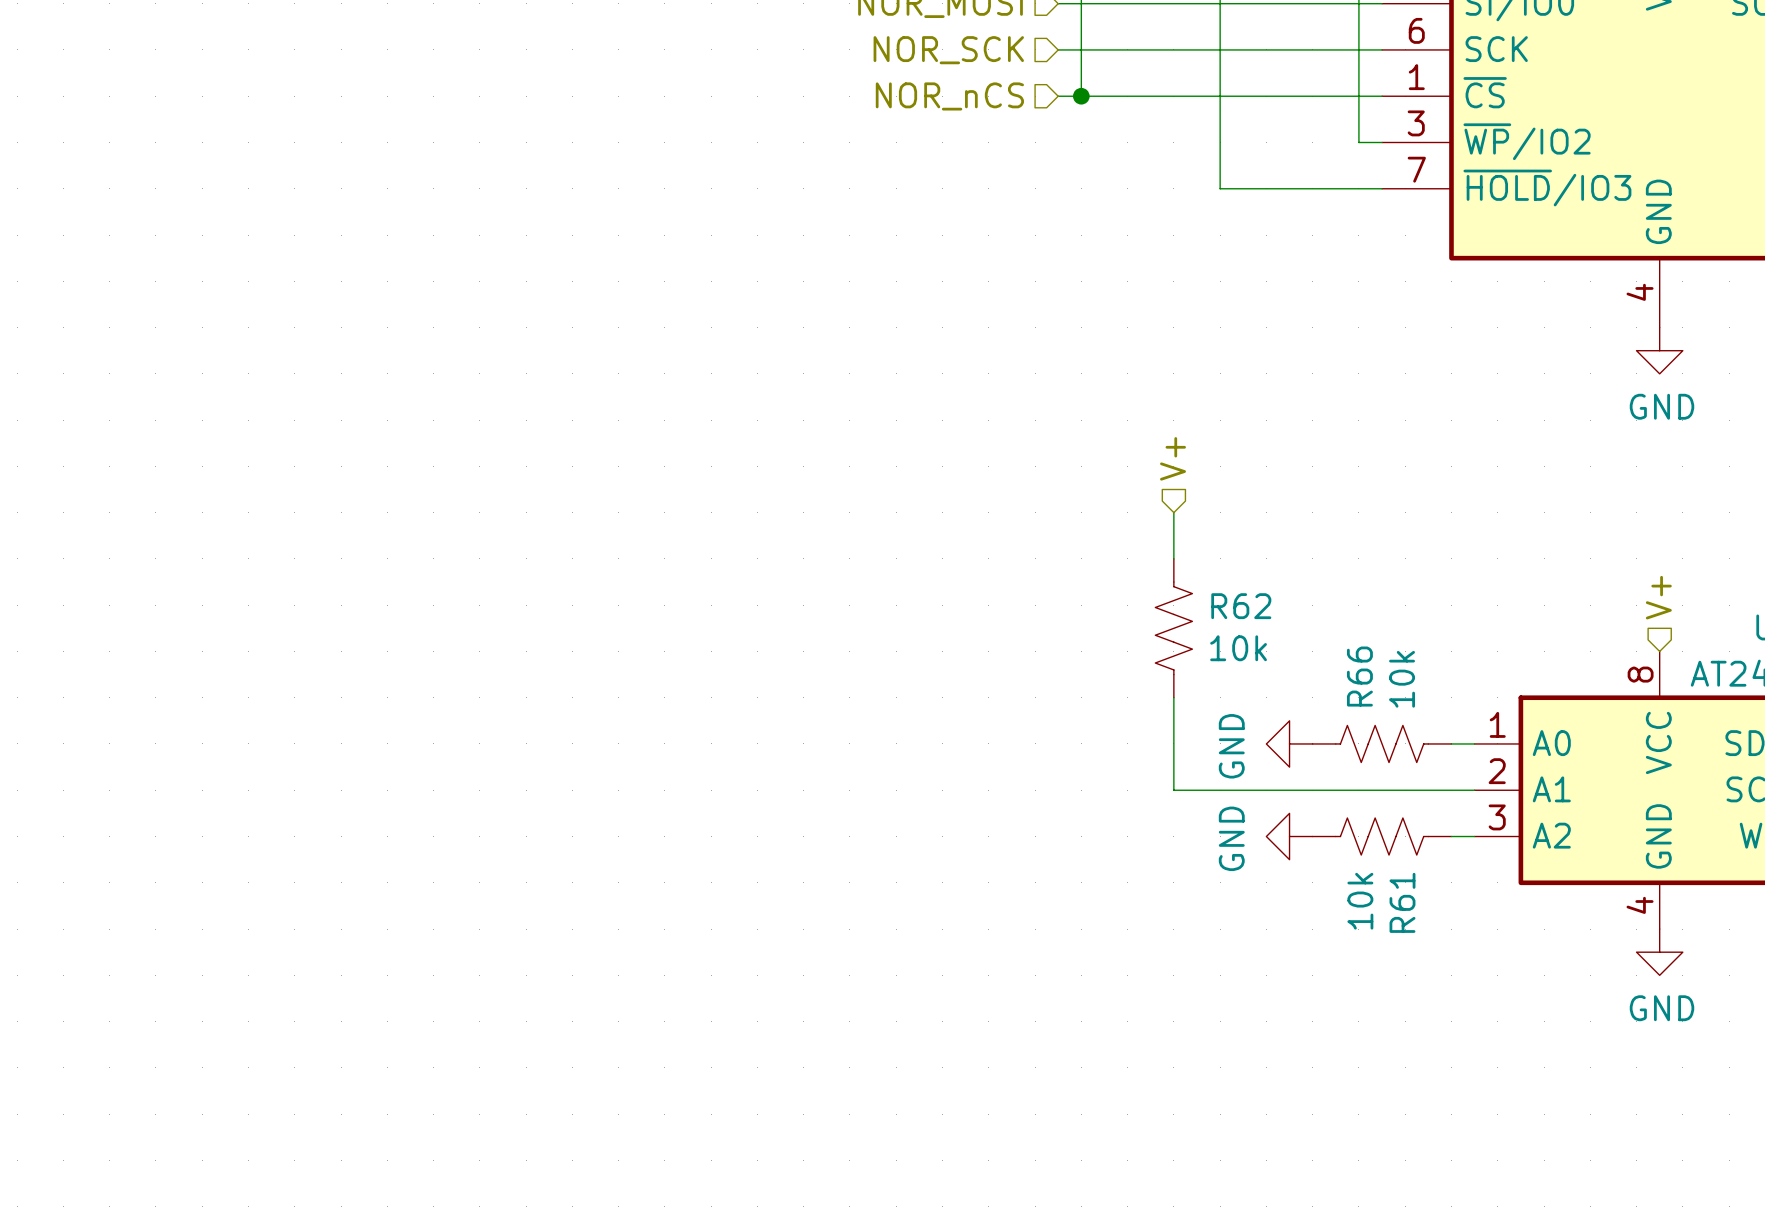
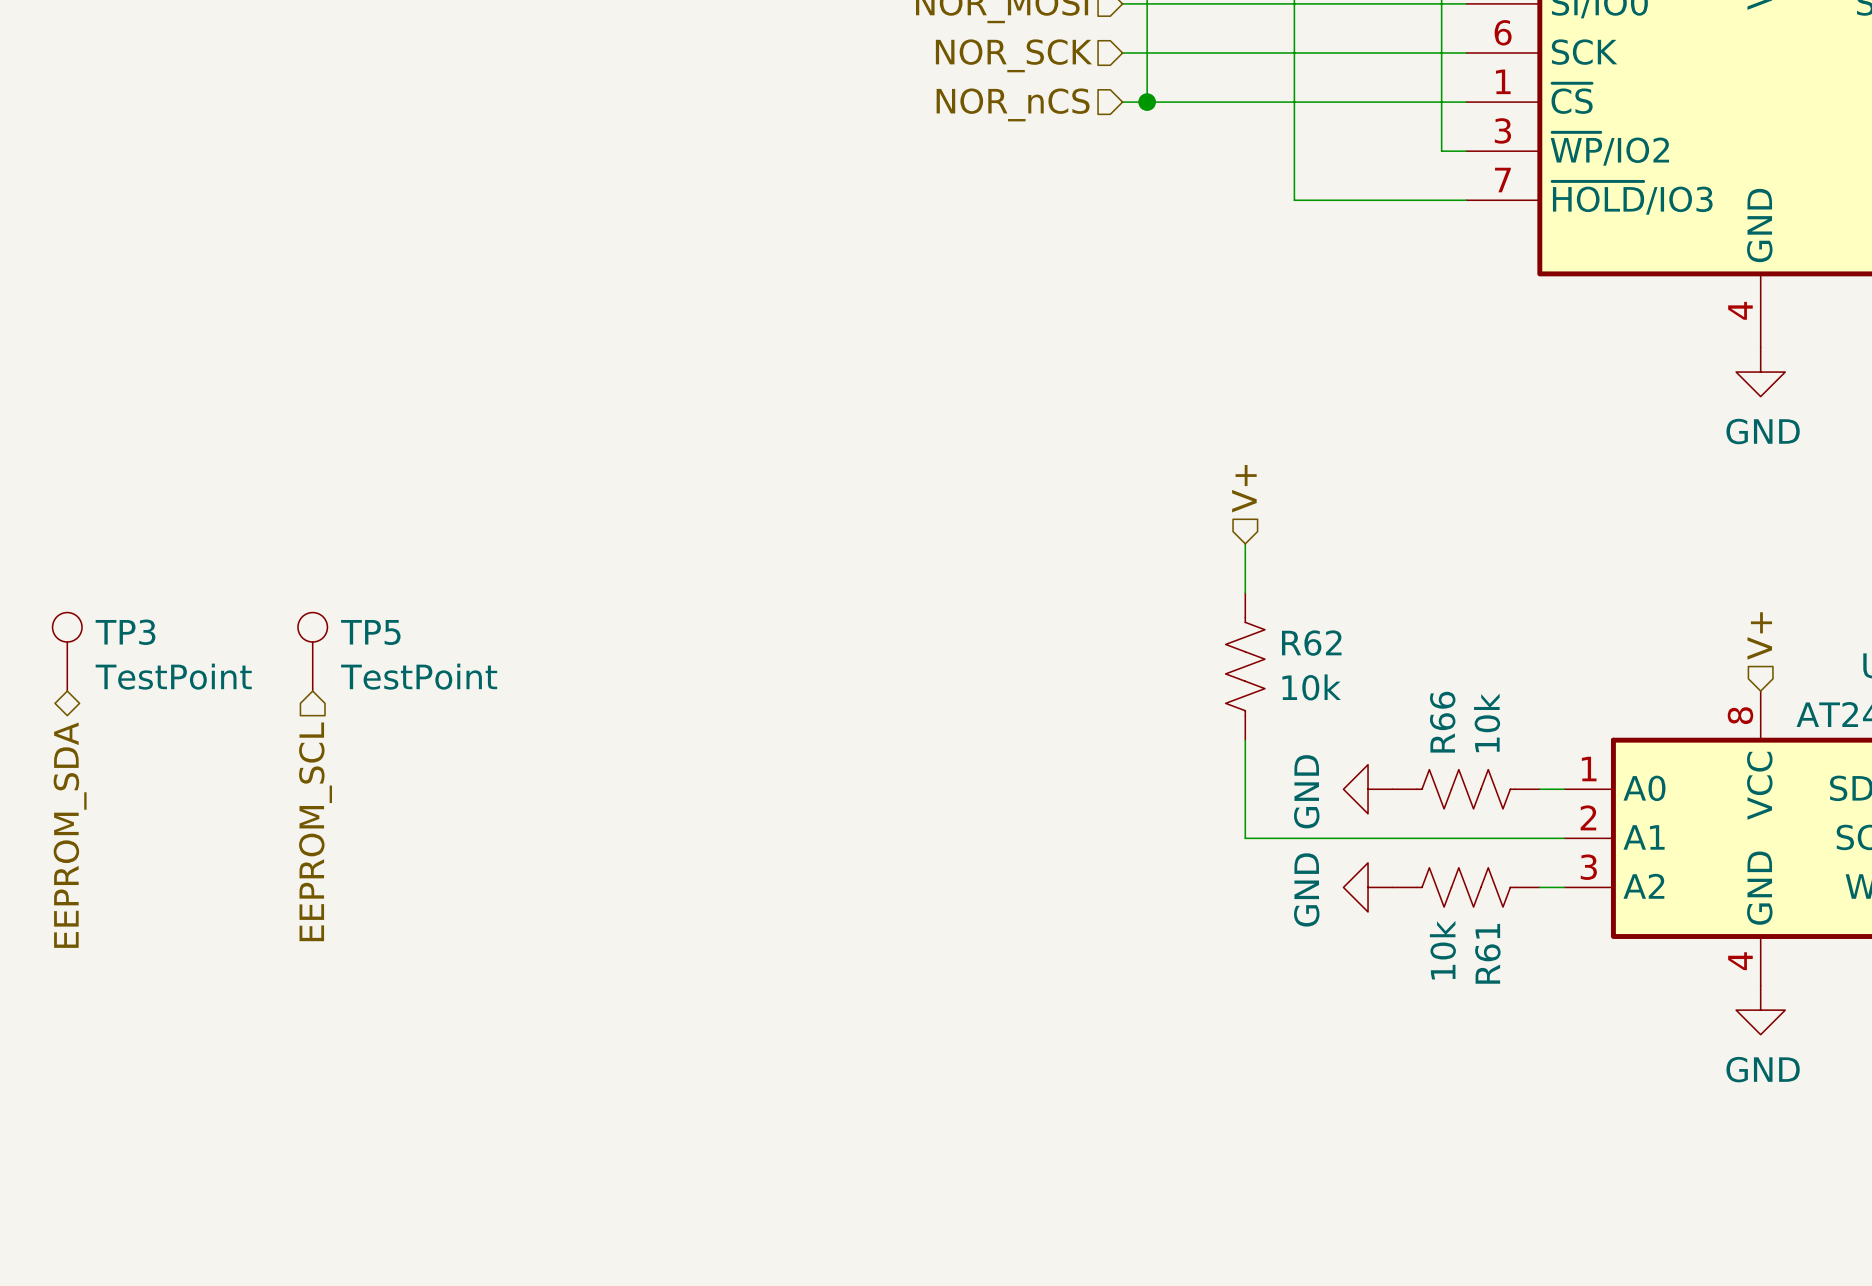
TP3: none -> TestPoint (67, 651)
TP5: none -> TestPoint (312, 651)
hierarchical label: none -> EEPROM_SDA (70, 835)
hierarchical label: none -> EEPROM_SCL (315, 831)

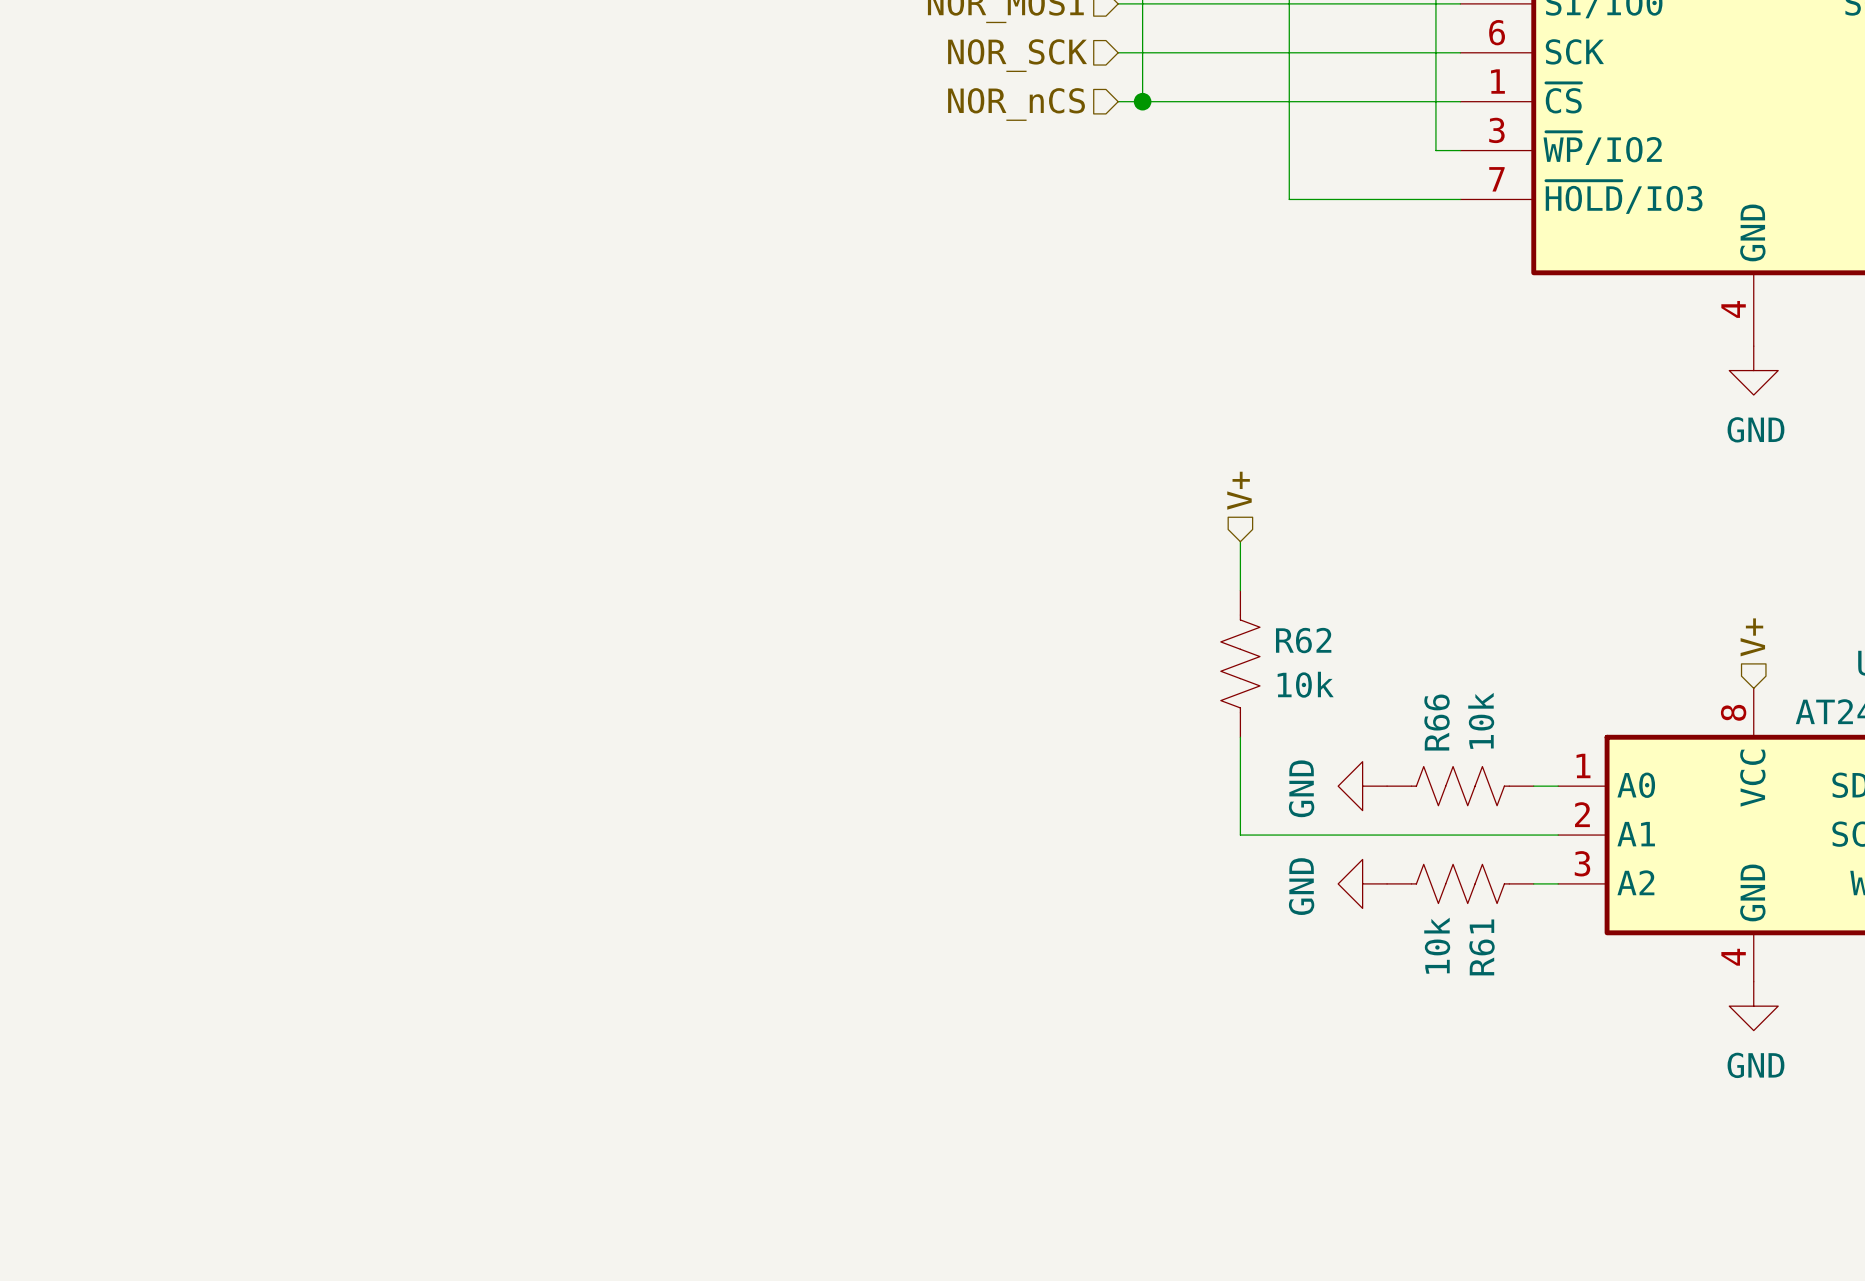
TP3: TestPoint (67, 651) -> none
TP5: TestPoint (312, 651) -> none
hierarchical label: EEPROM_SCL (315, 831) -> none
hierarchical label: EEPROM_SDA (70, 835) -> none

